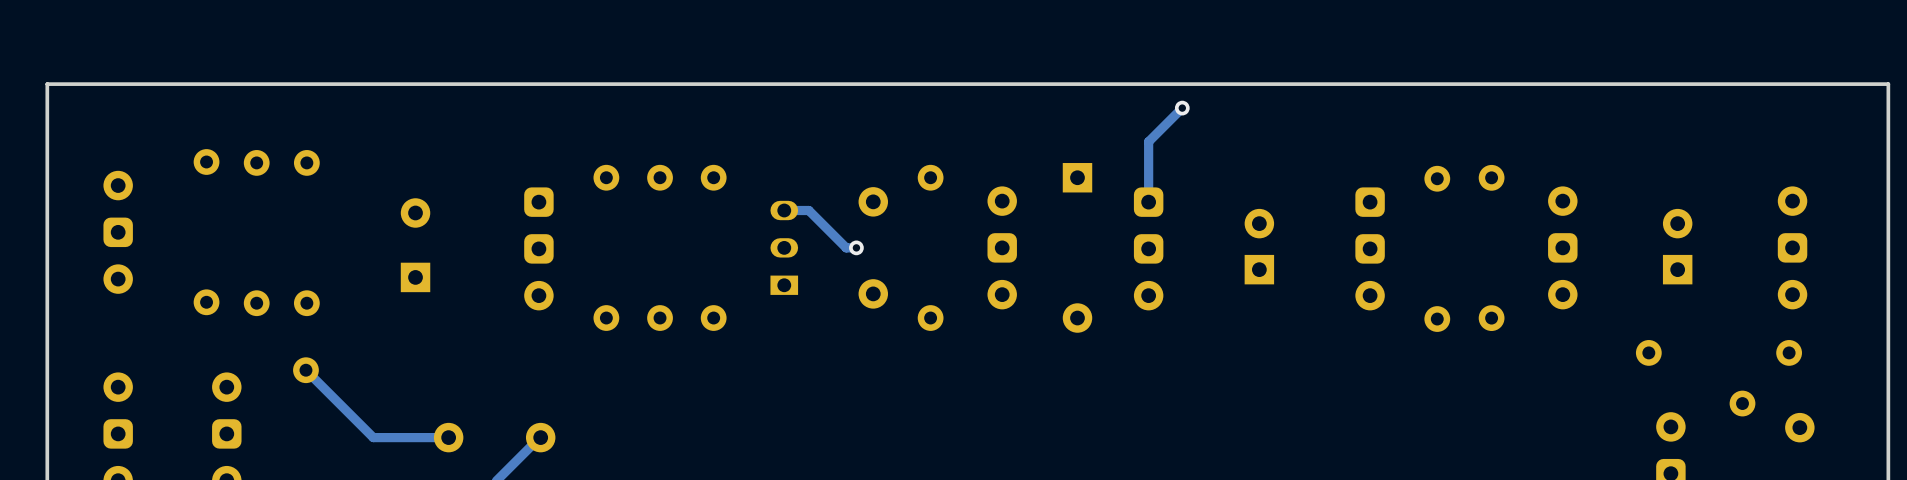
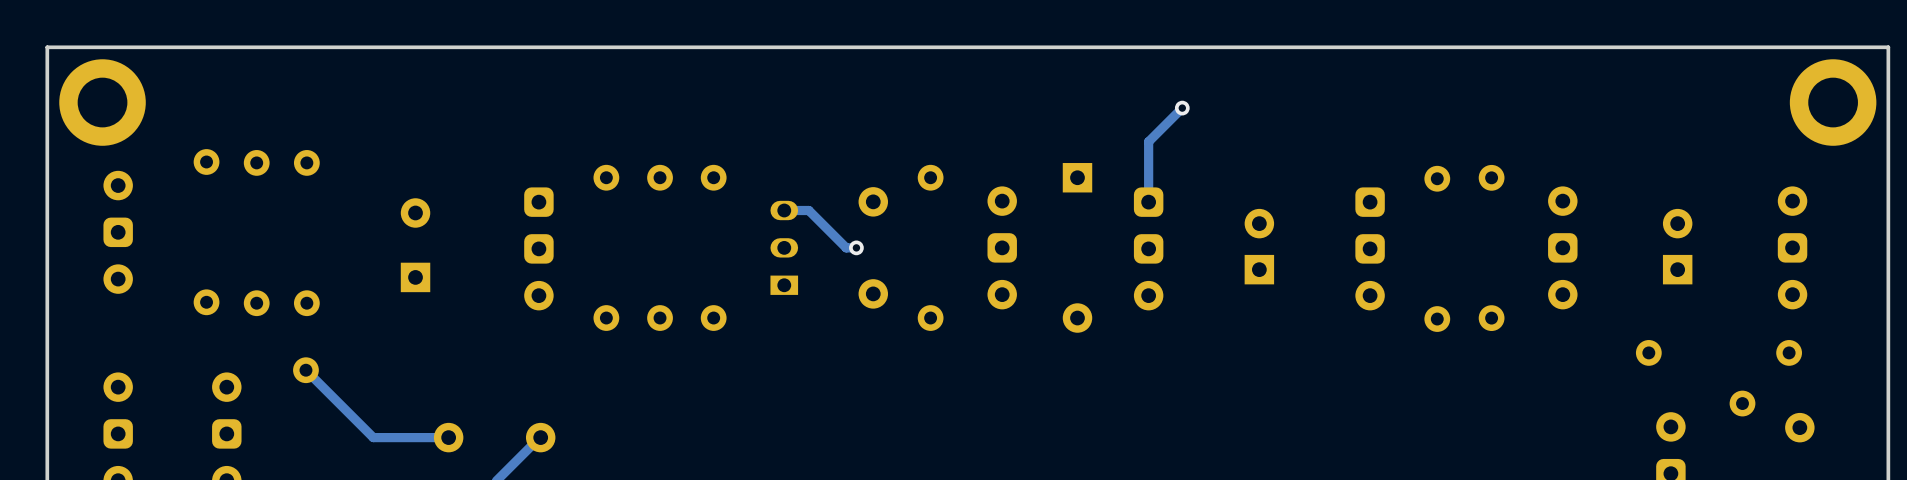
board edge: (1888, 84) (47, 84) -> (1888, 84) (1888, 47) (47, 47) (47, 84)
part: none -> (102, 102)
part: none -> (1833, 102)

